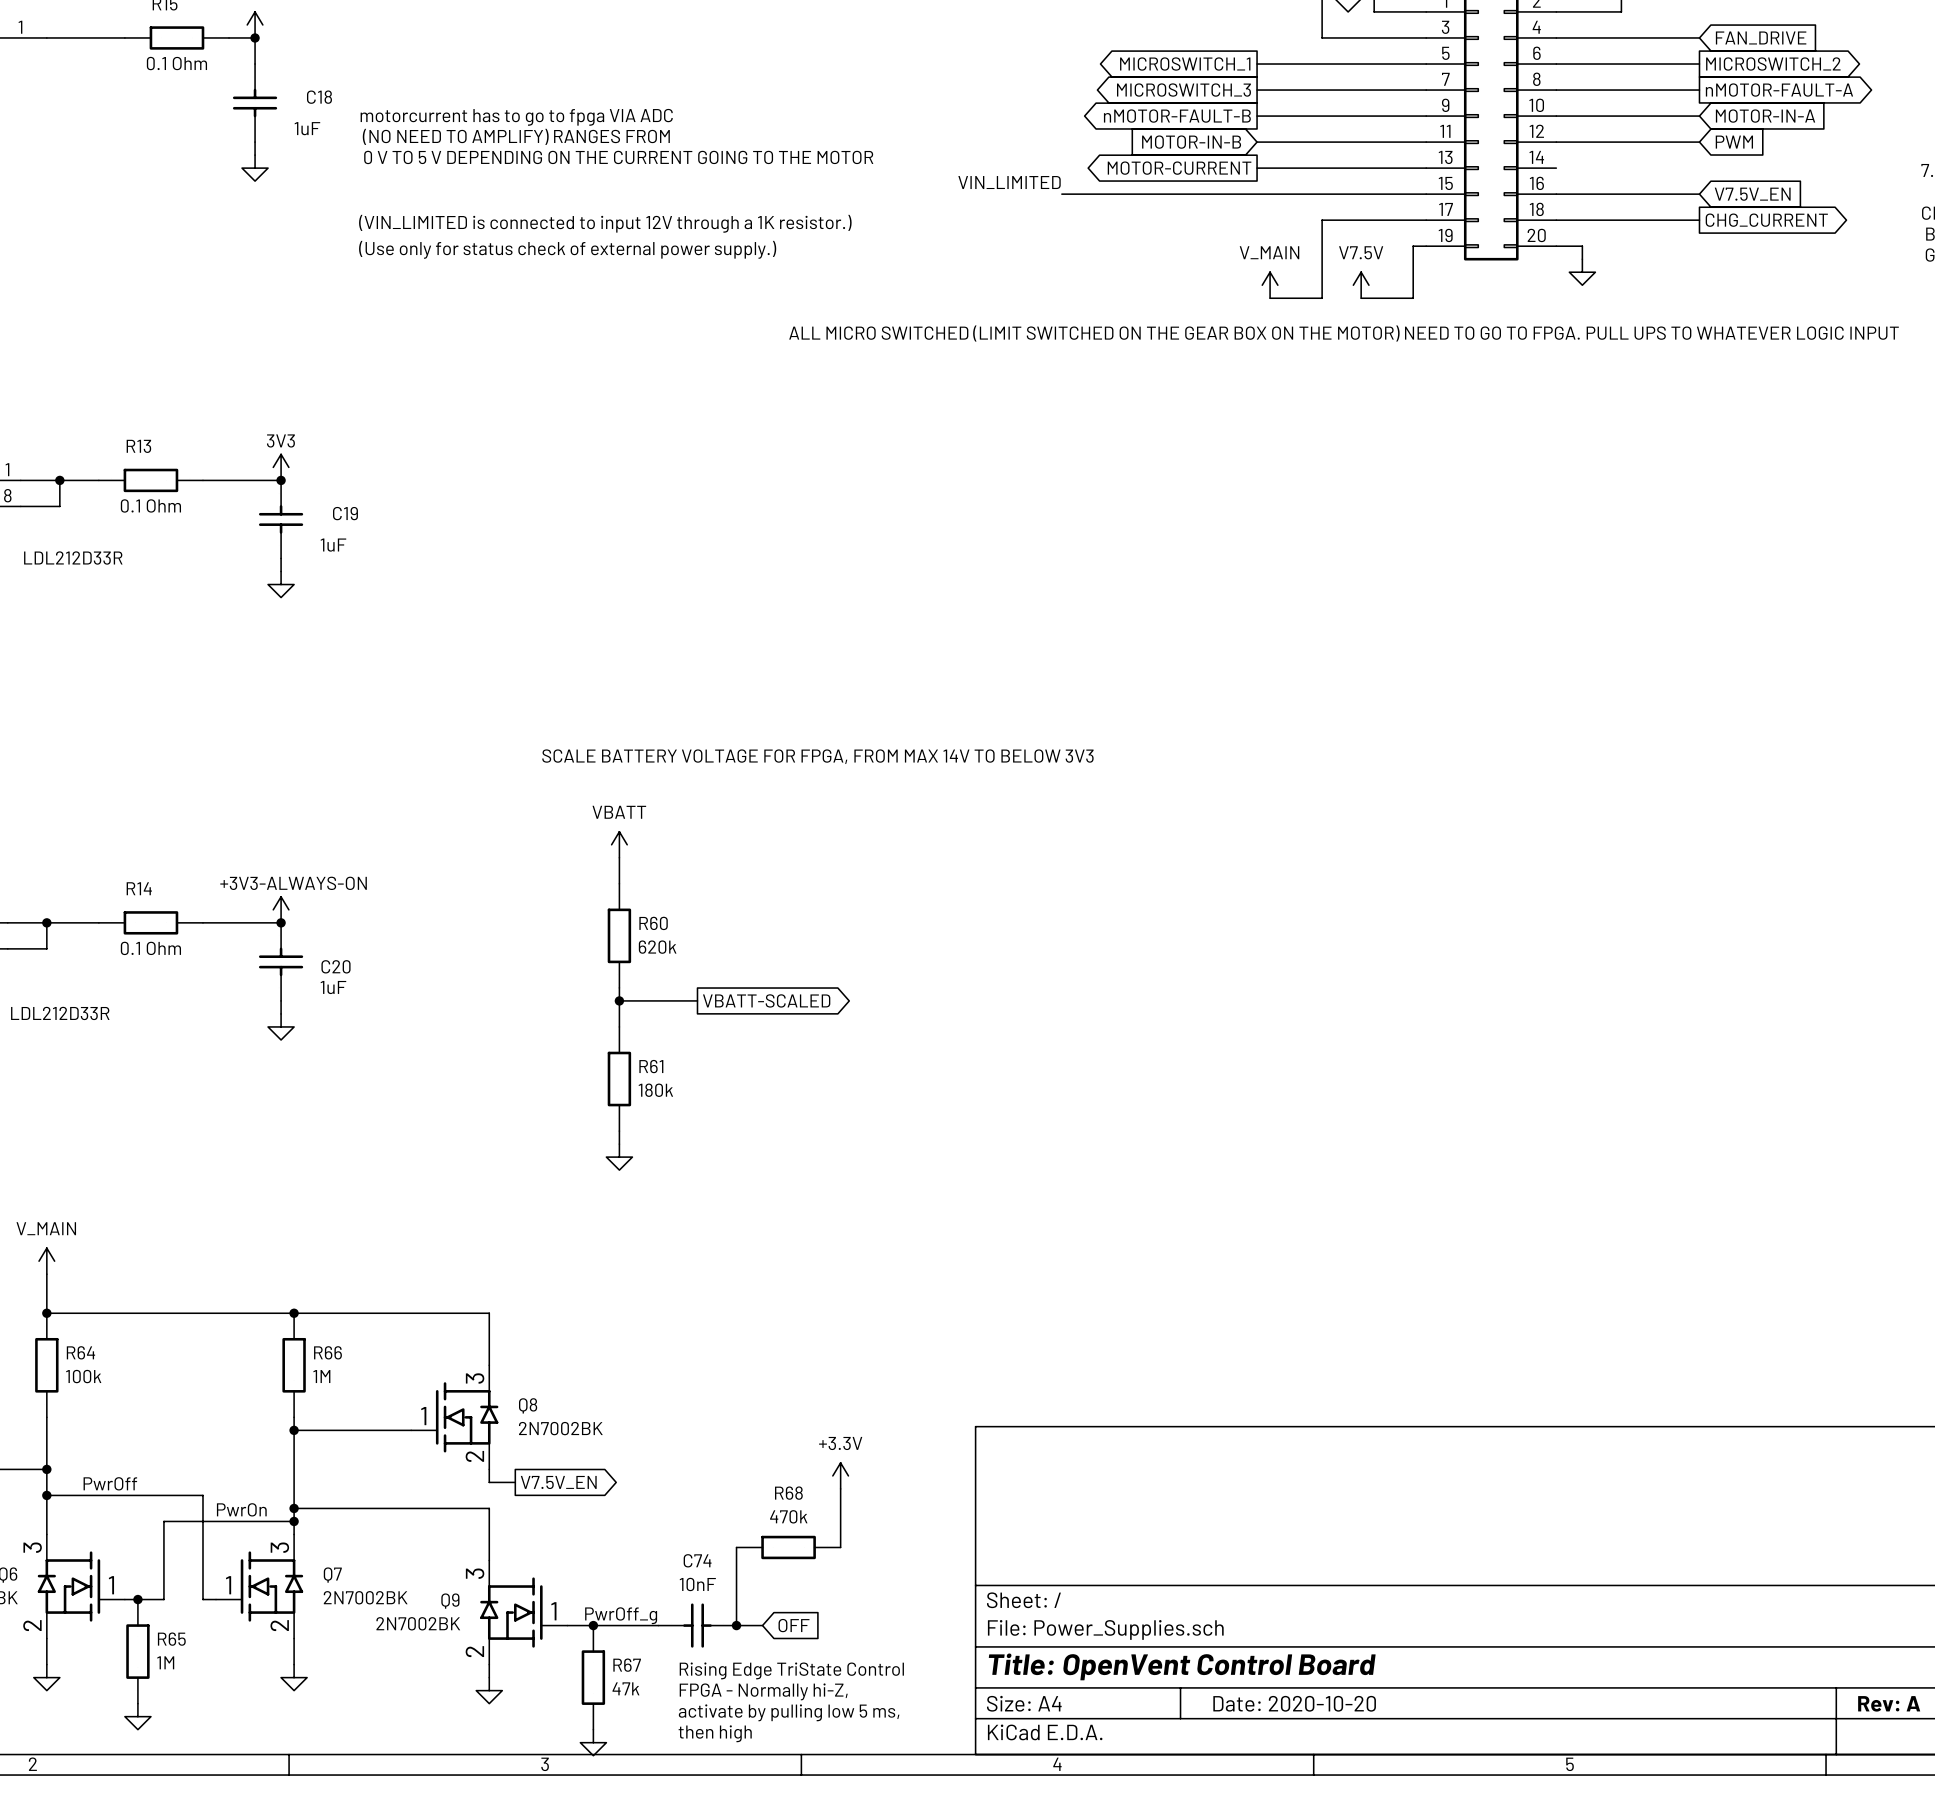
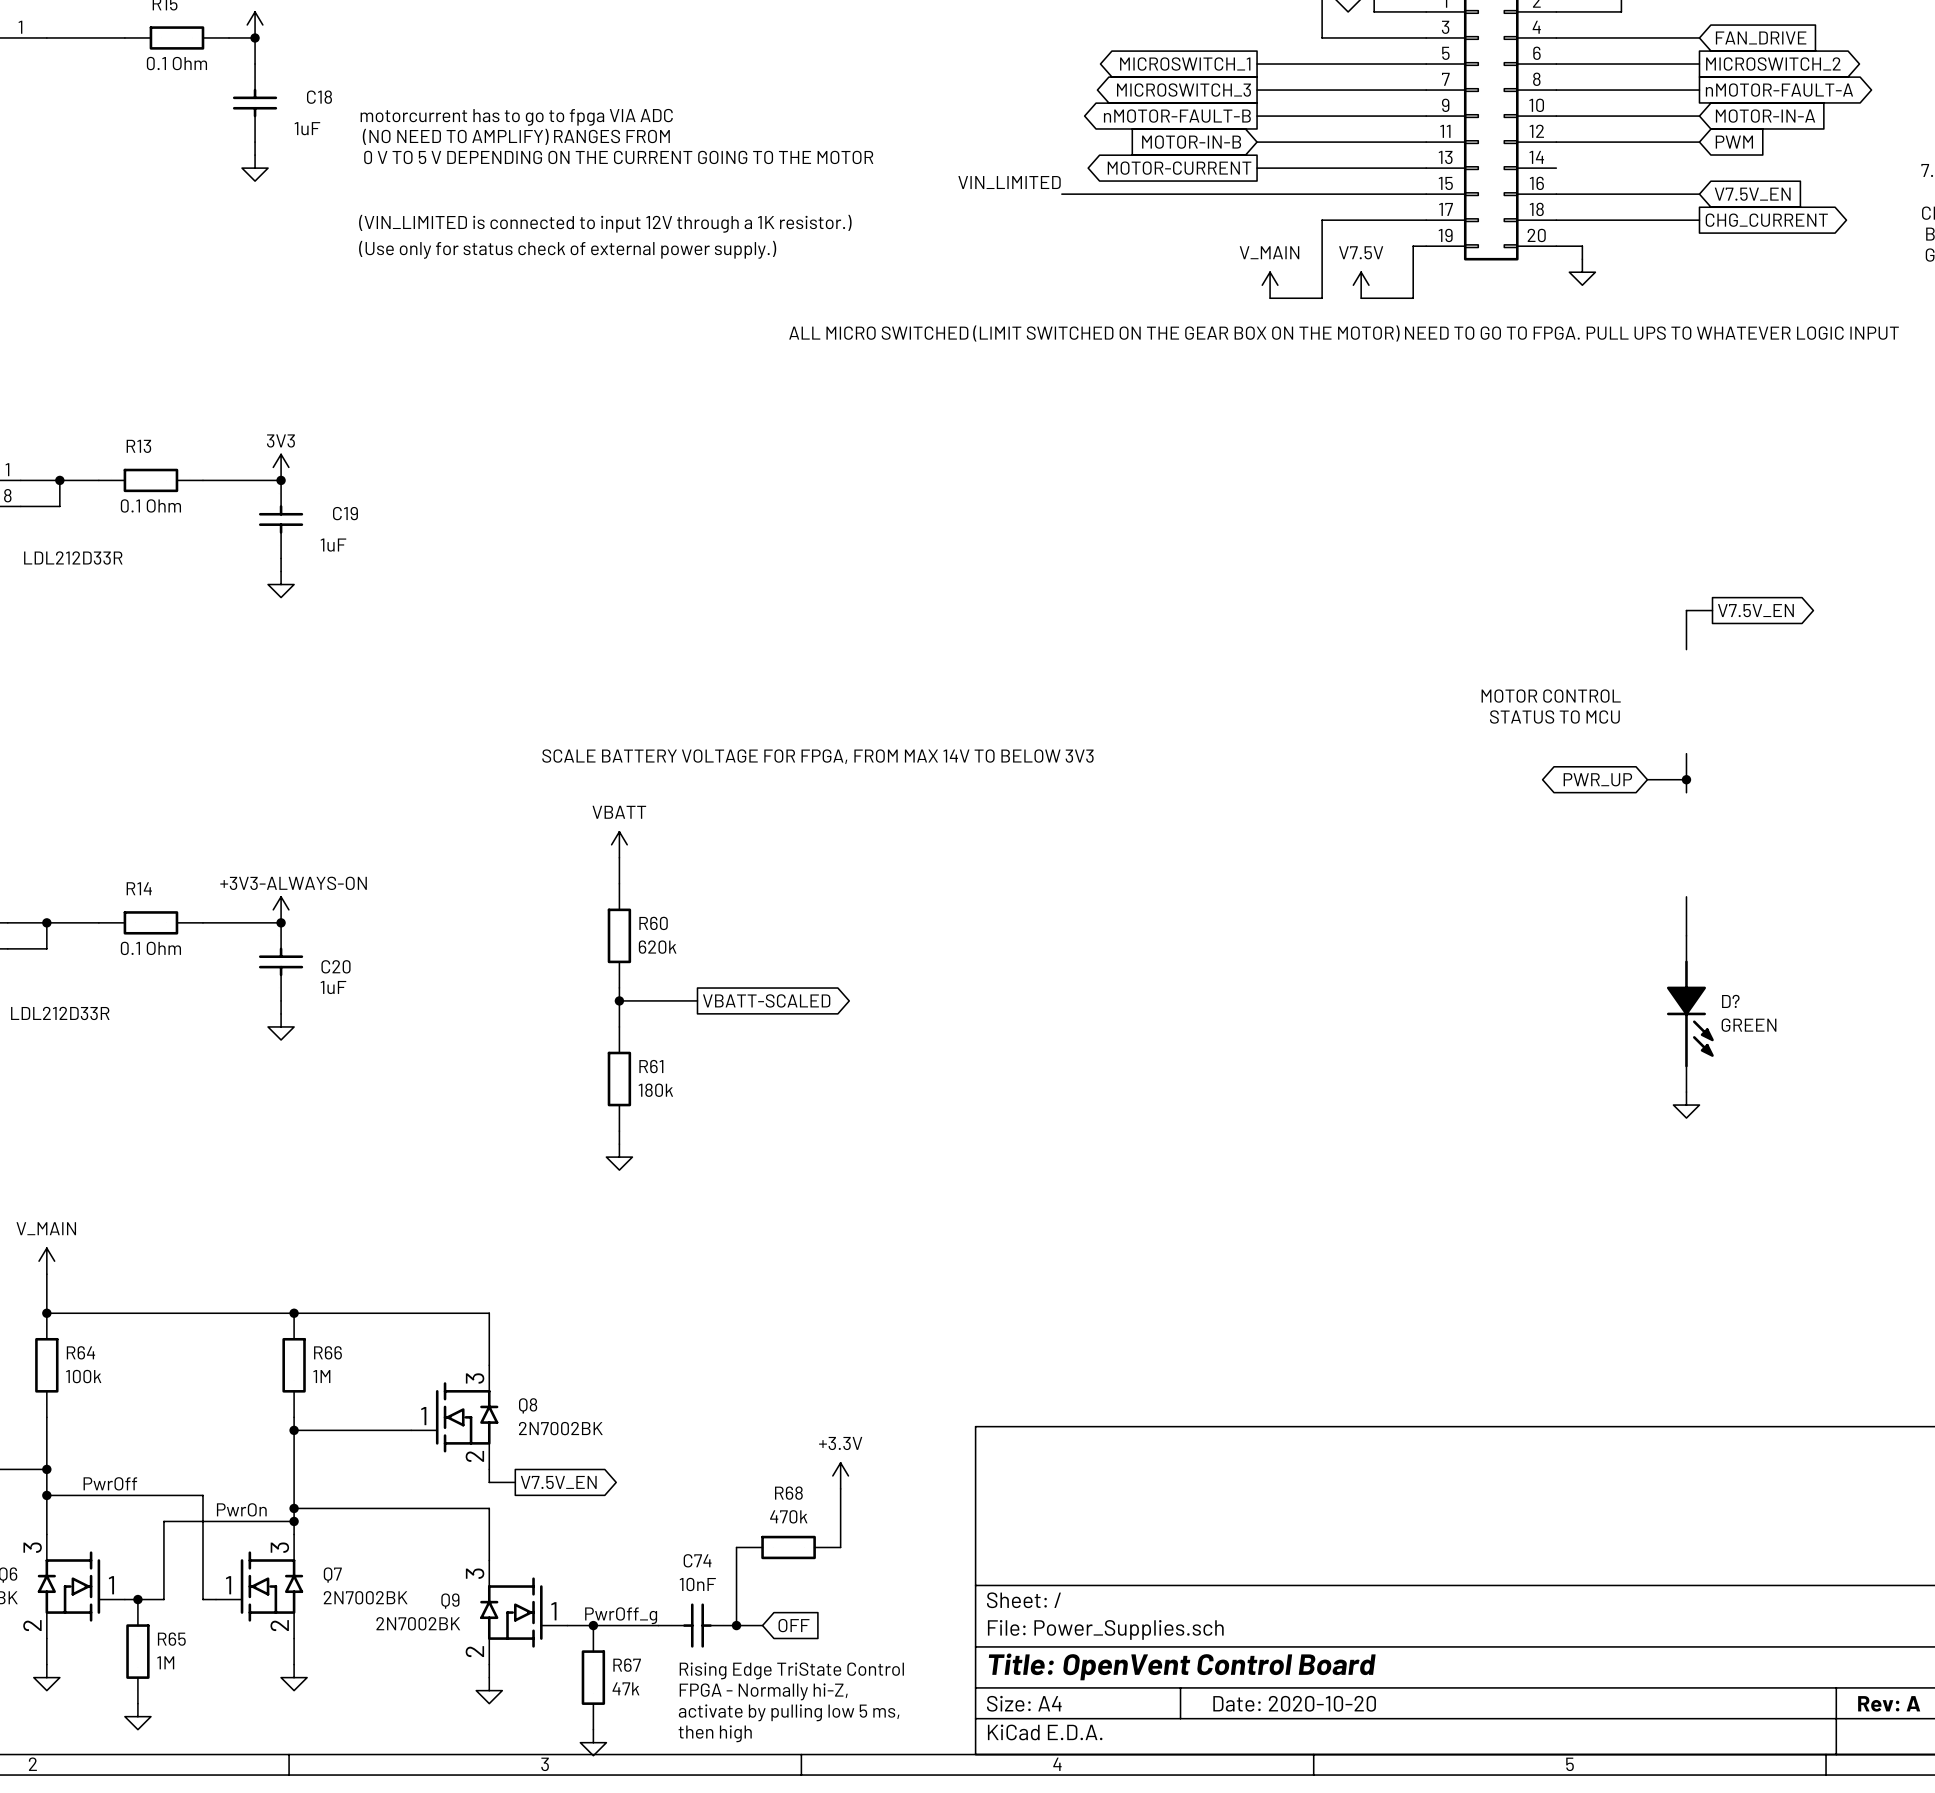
wire: none -> (1712, 610) (1686, 610) (1686, 649)
global label: none -> V7.5V_EN (1755, 610)
text: none -> MOTOR CONTROL (1551, 696)
text: none -> STATUS TO MCU (1554, 717)
wire: none -> (1686, 753) (1686, 792)
global label: none -> PWR_UP (1597, 779)
wire: none -> (1647, 779) (1686, 779)
junction: none -> (1686, 779)
wire: none -> (1686, 896) (1686, 935)
D?: none -> (1690, 1013)
power symbol: none -> (1686, 1105)

